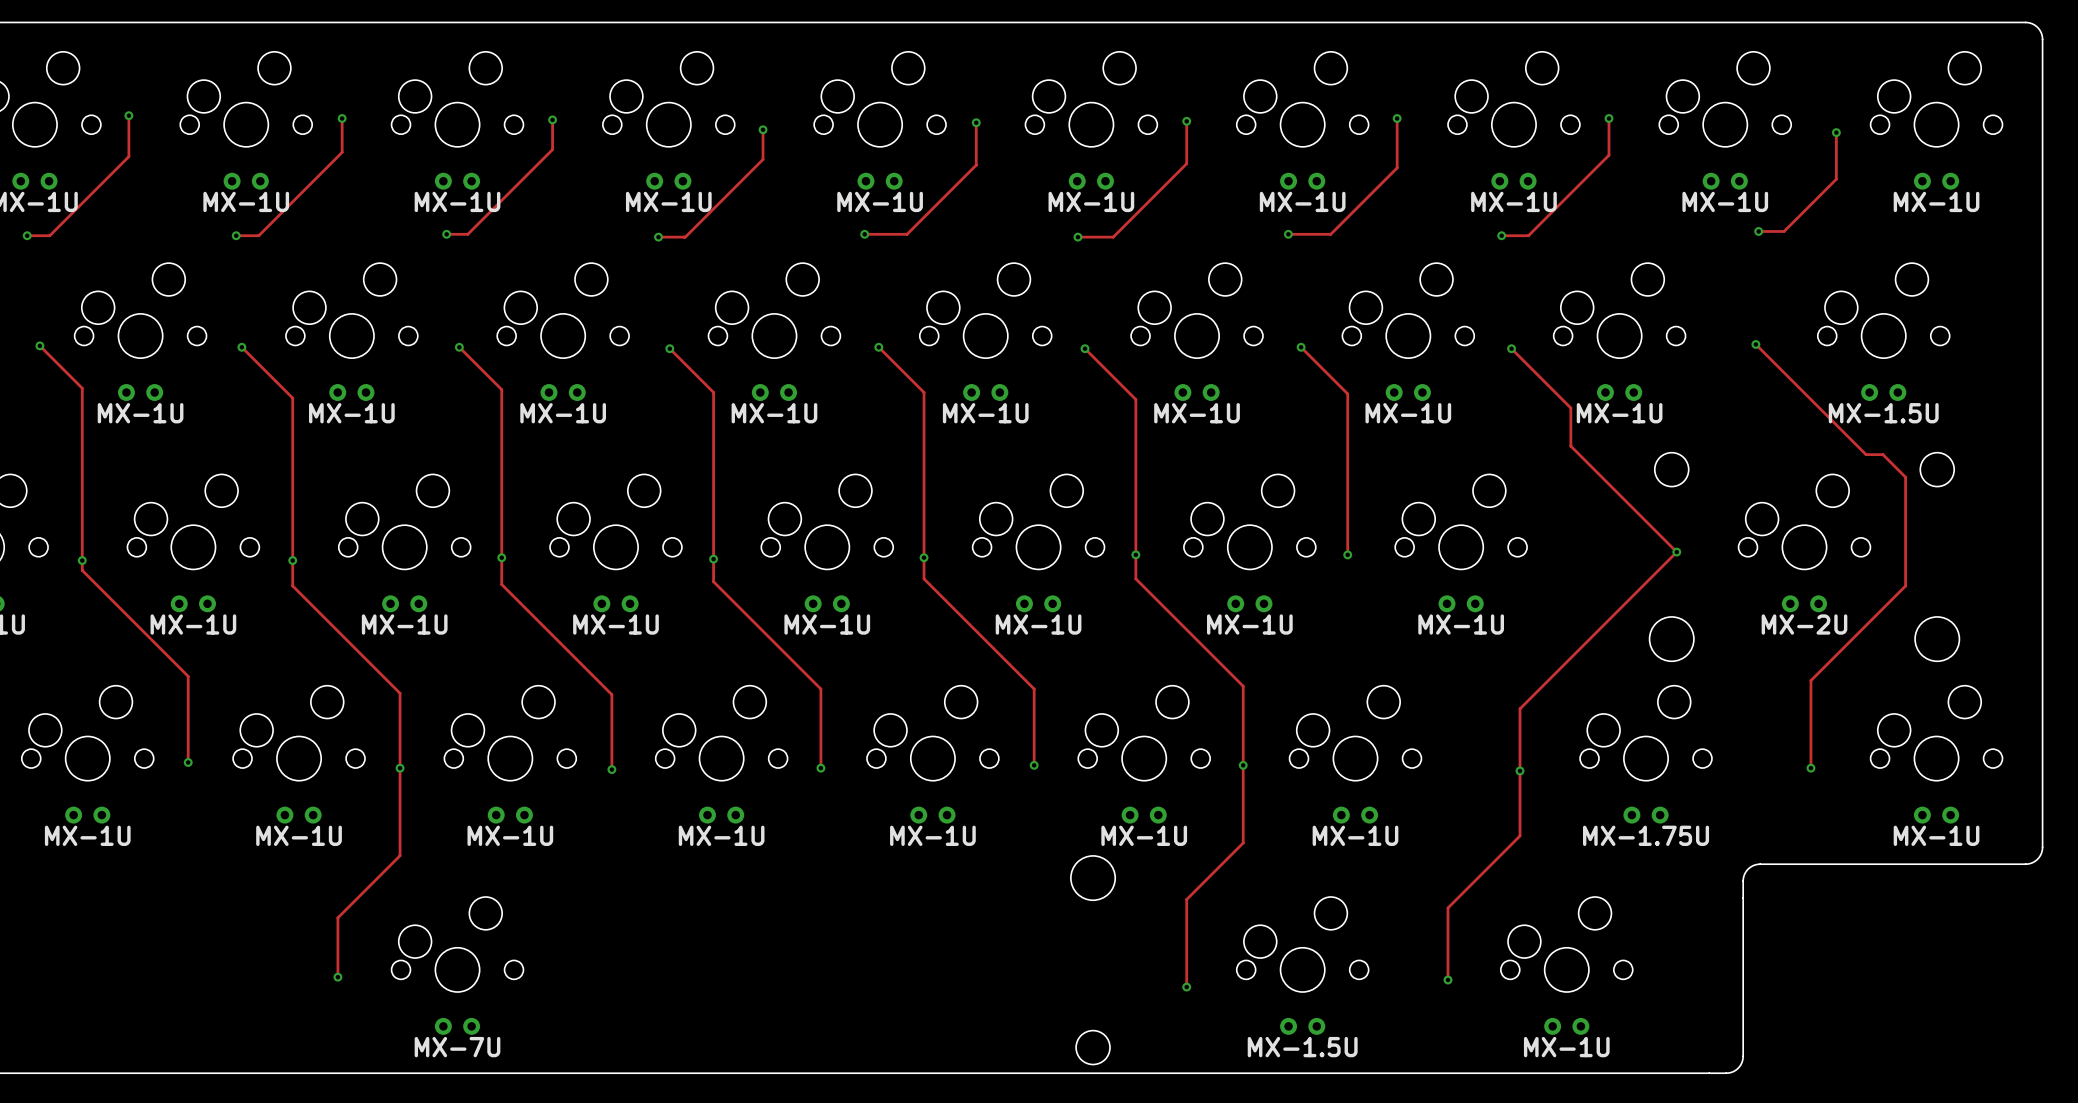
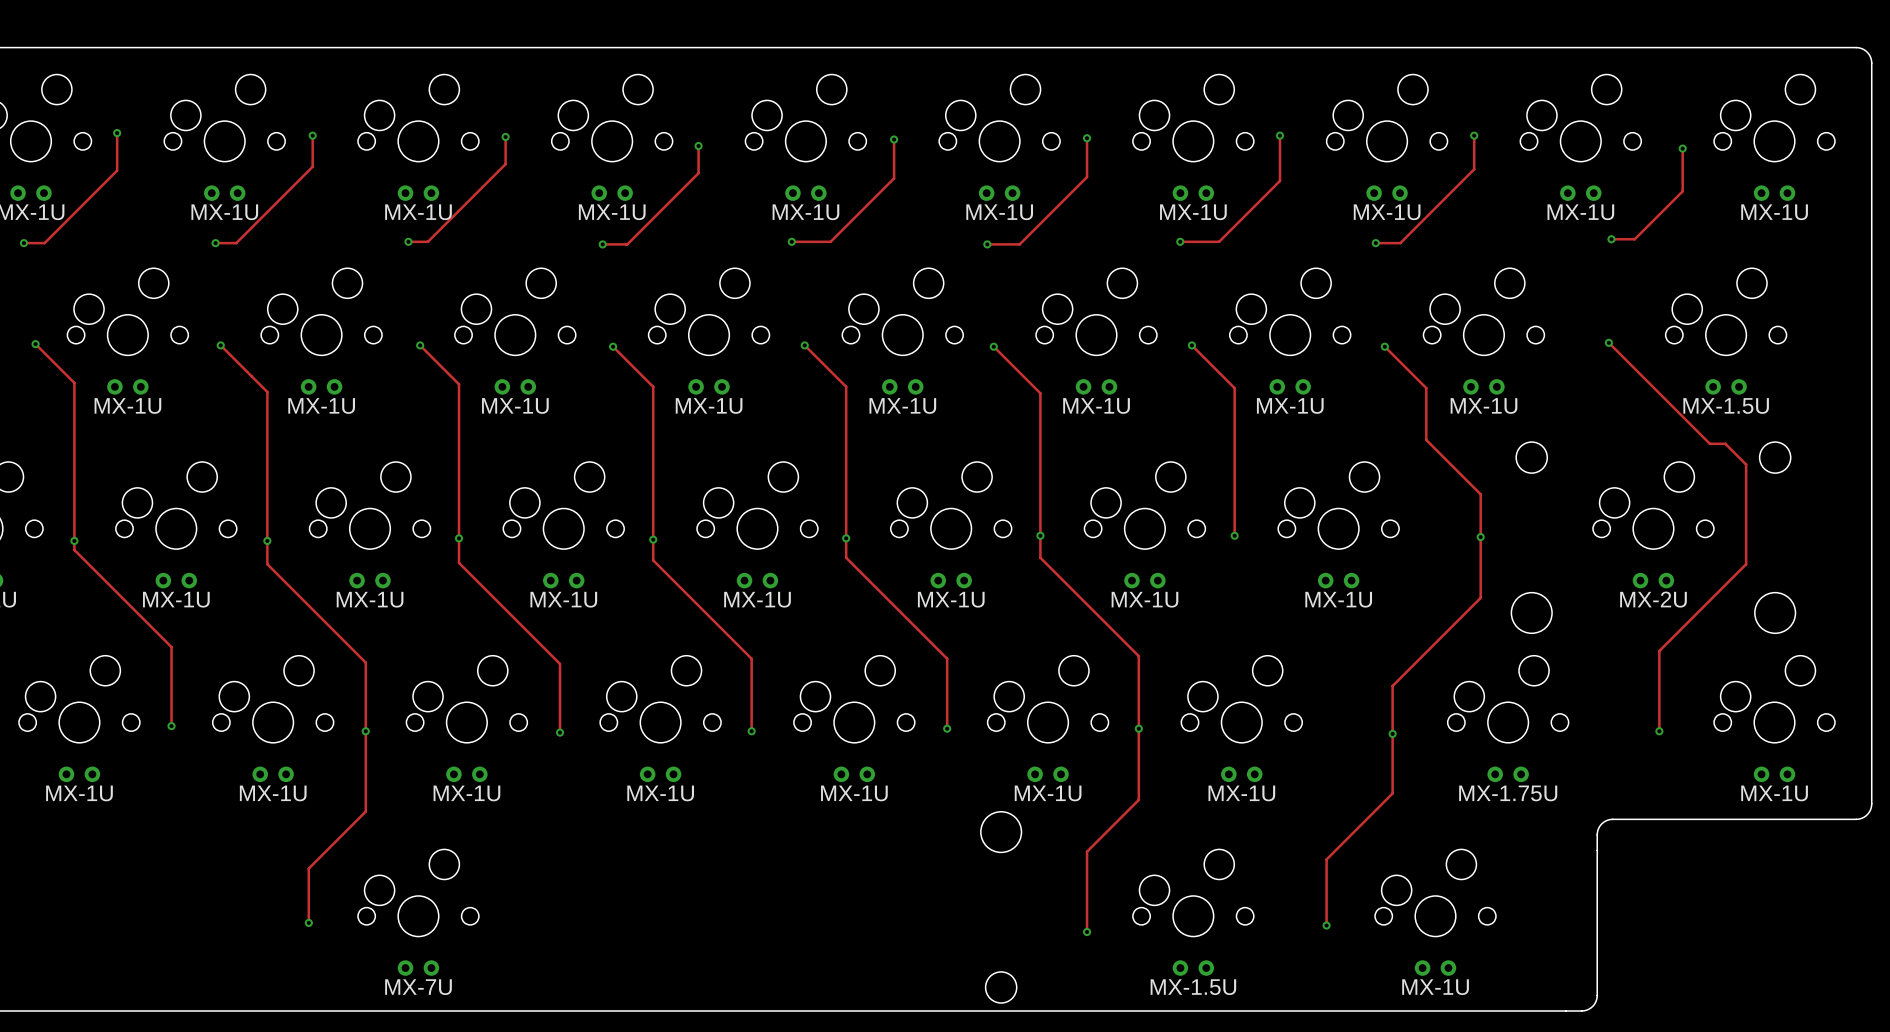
track: (1556, 393) (1570, 408) (1570, 446) (1676, 552) (1520, 708) (1520, 718) -> (1426, 388) (1426, 439) (1480, 494) (1480, 597) (1392, 685)
via position: (1676, 552) -> (1480, 537)

